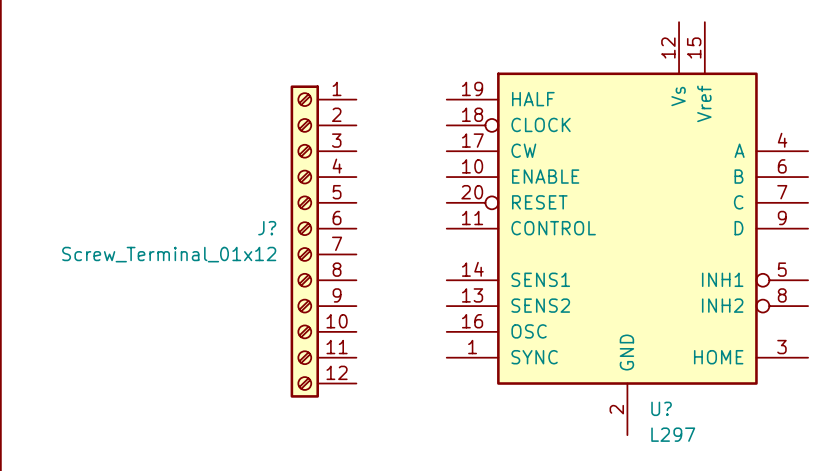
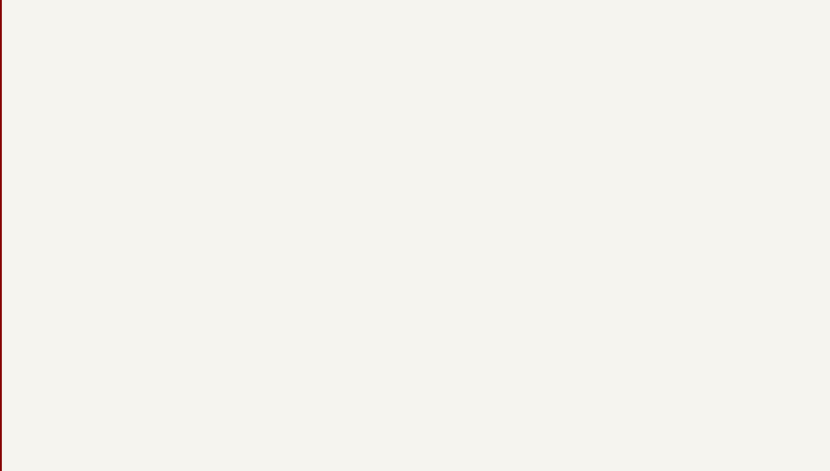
U?: L297 (627, 228) -> none
J?: Screw_Terminal_01x12 (323, 241) -> none

